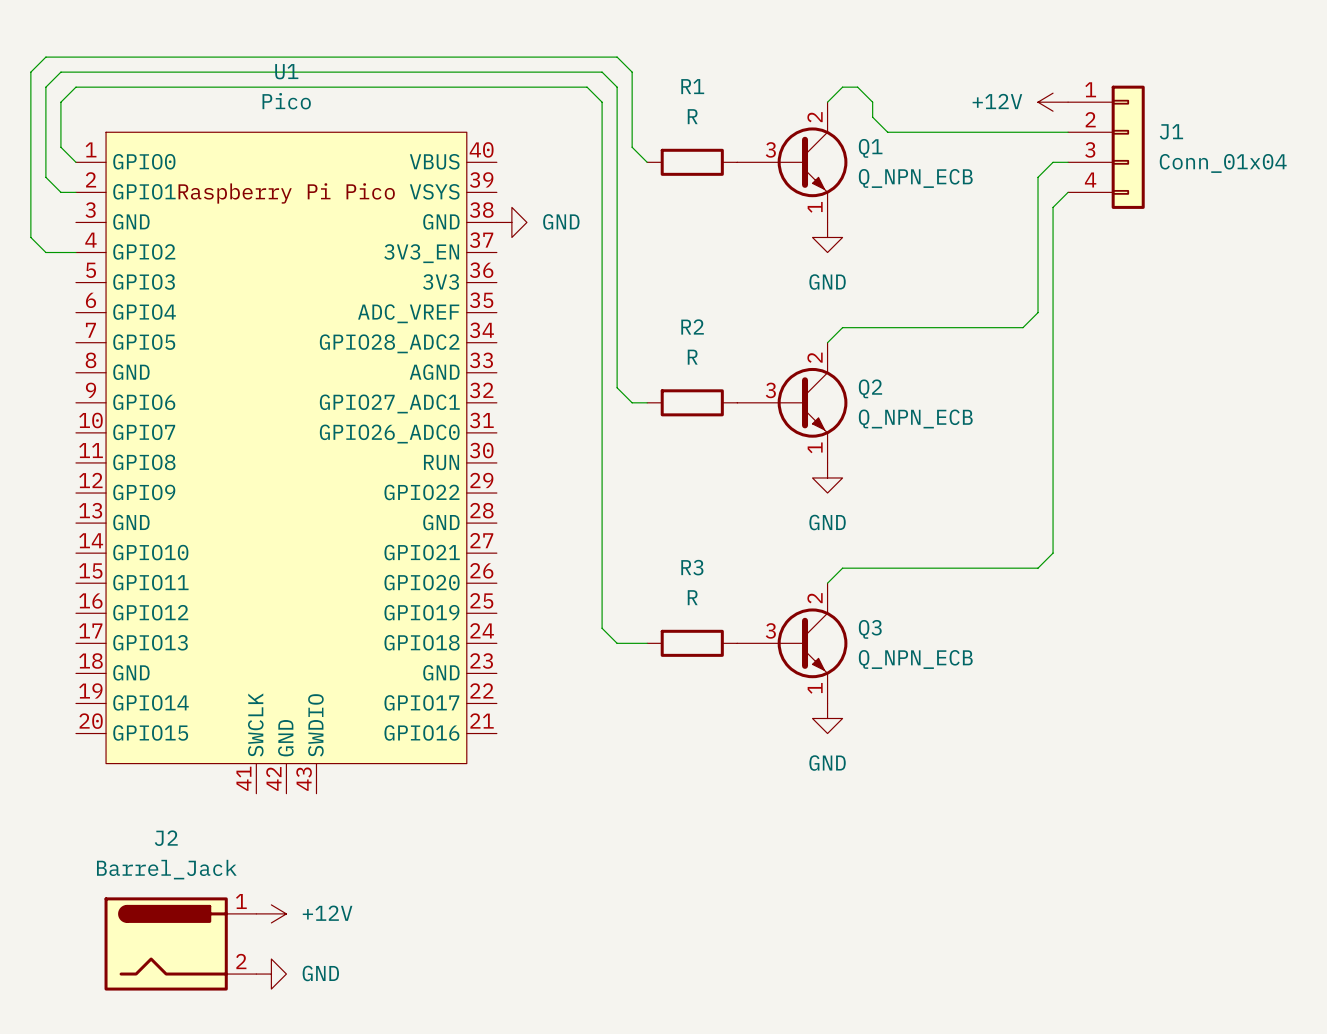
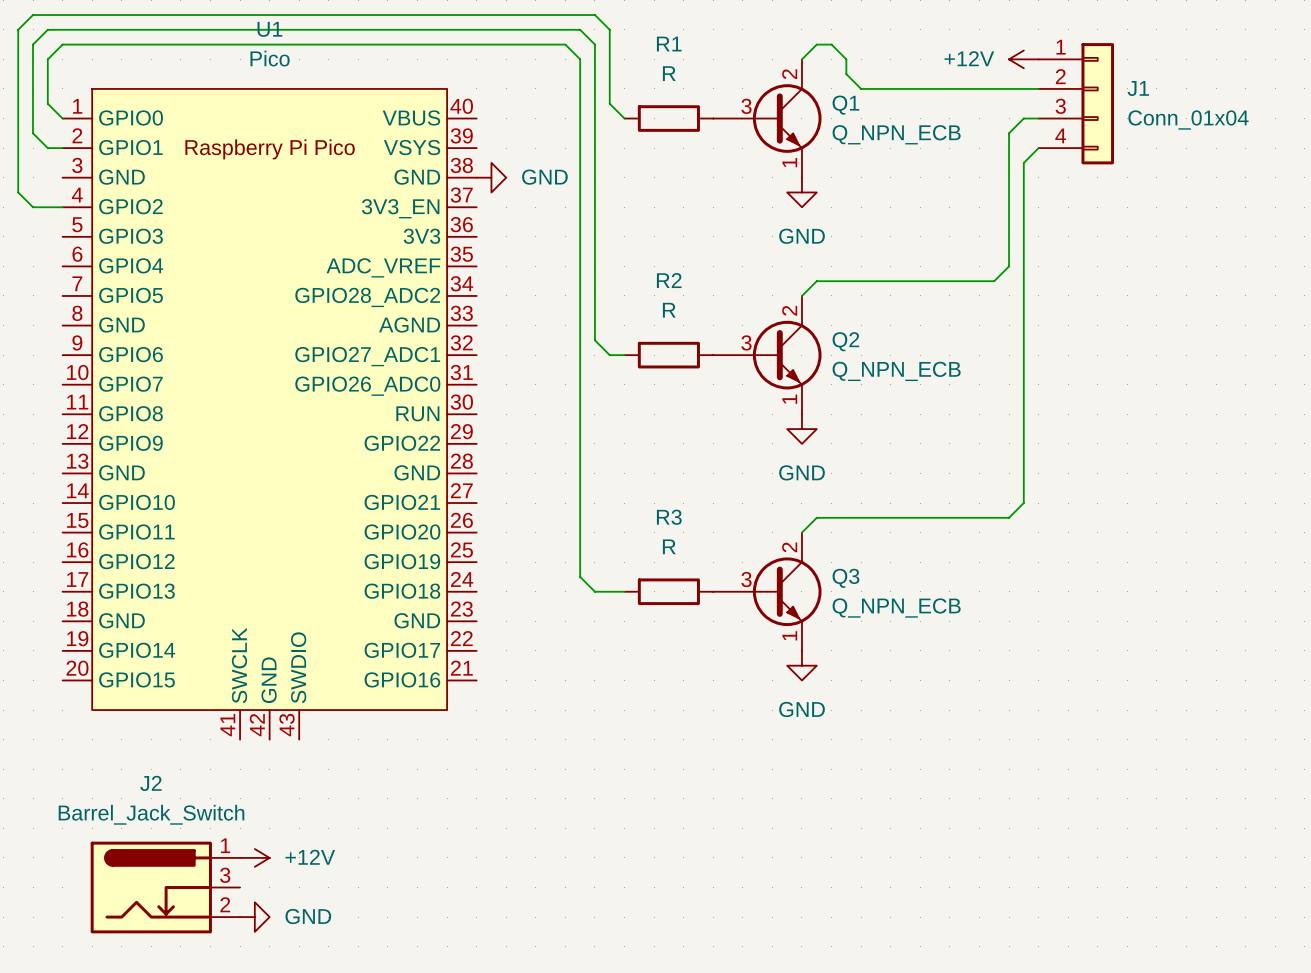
J2 value: Barrel_Jack (166, 869) -> Barrel_Jack_Switch (151, 814)
J2 symbol: [104, 897, 257, 991] -> [90, 841, 241, 934]

